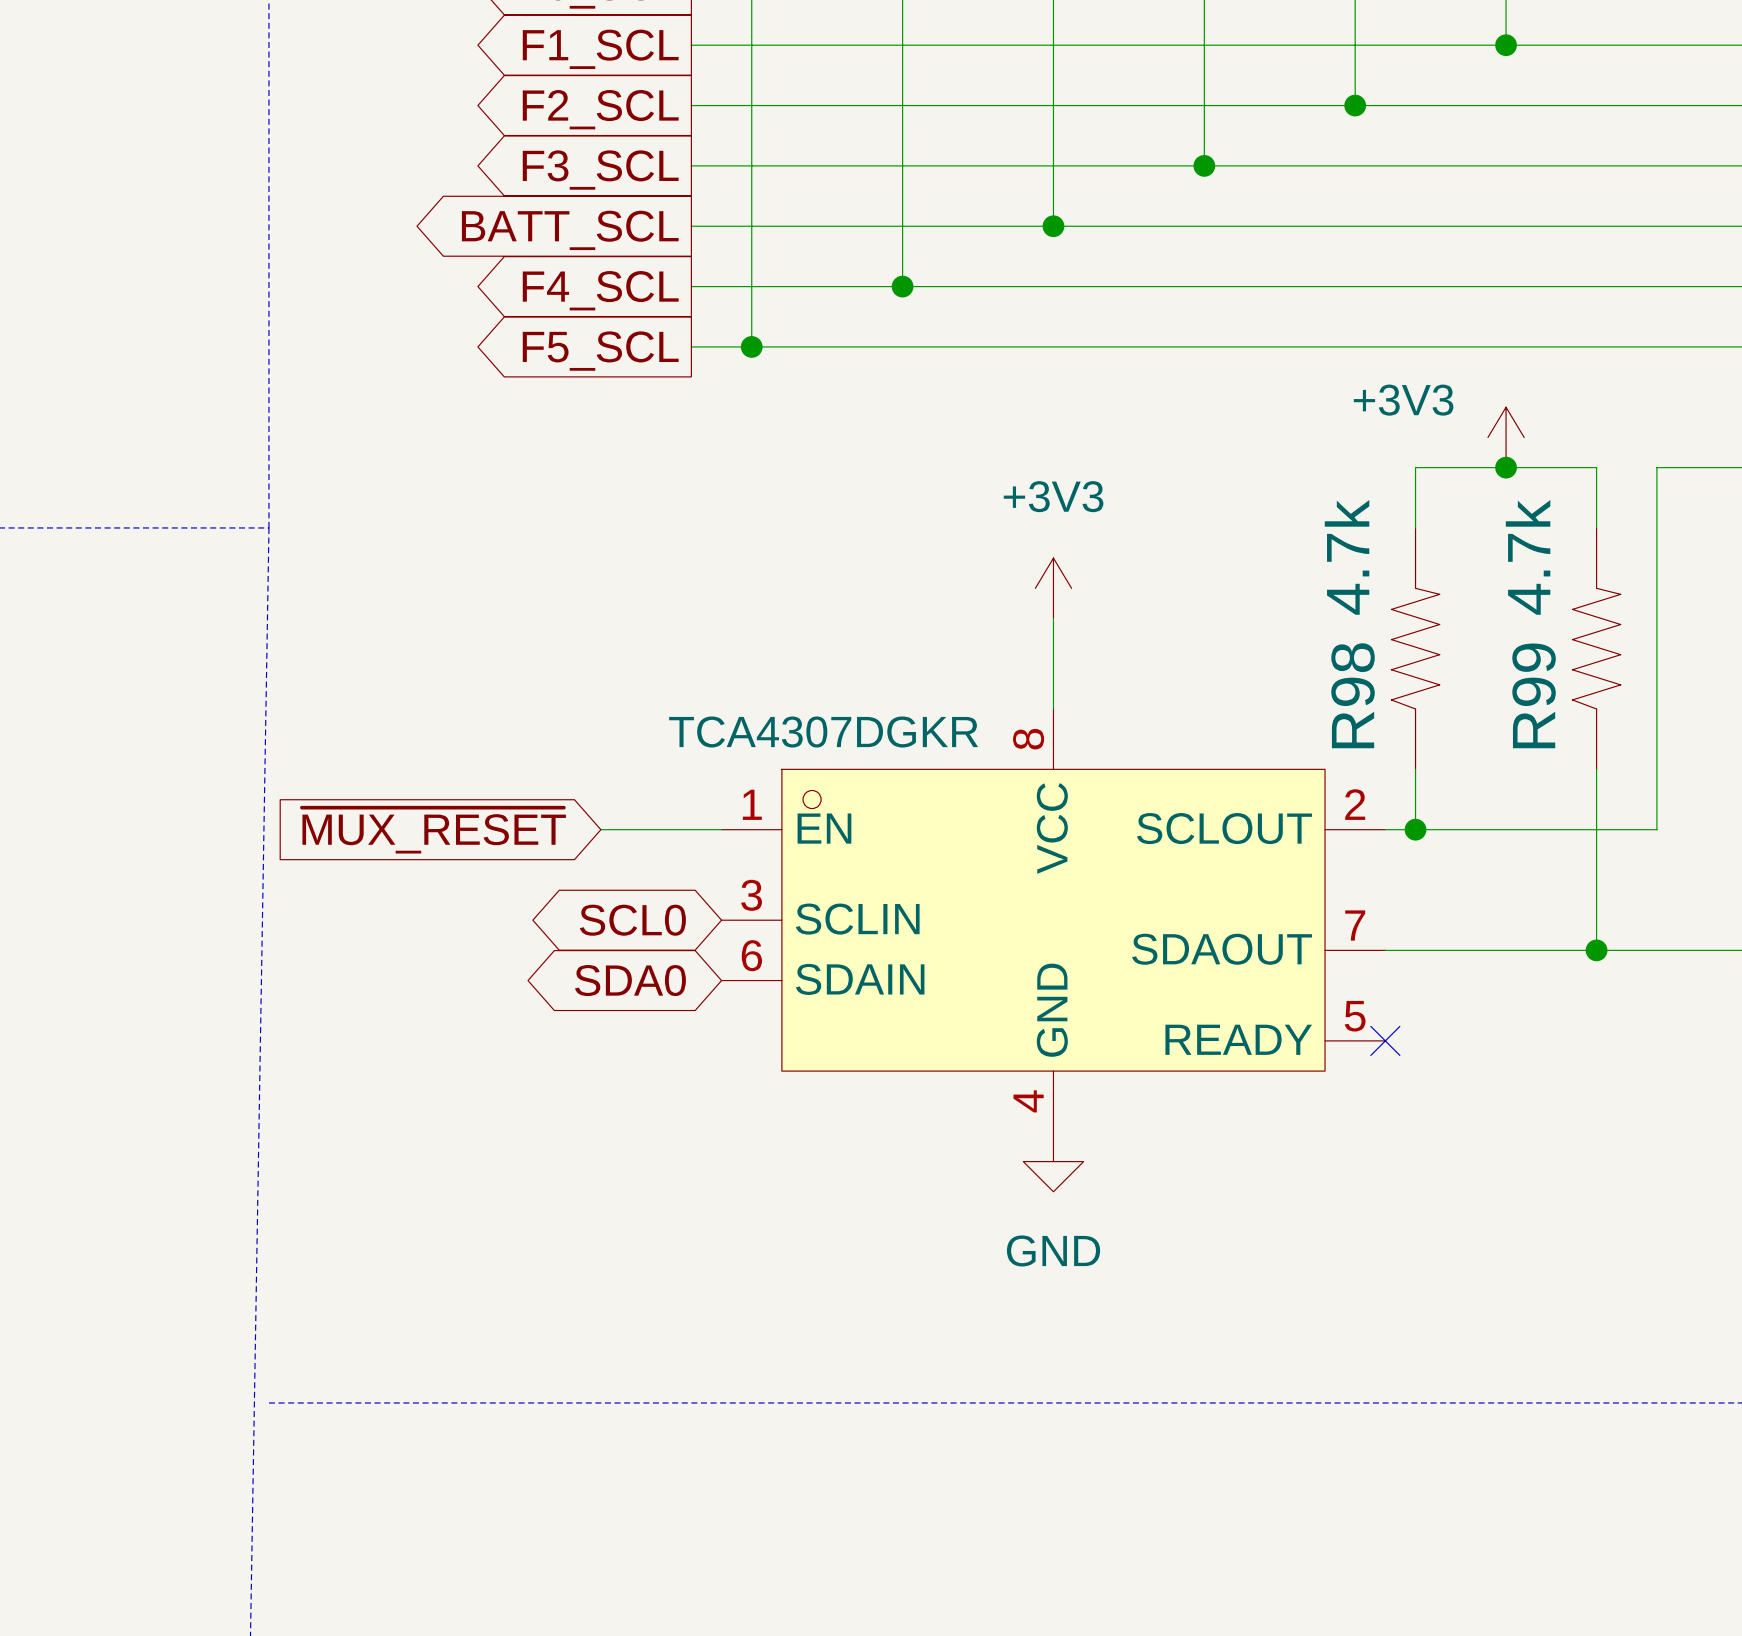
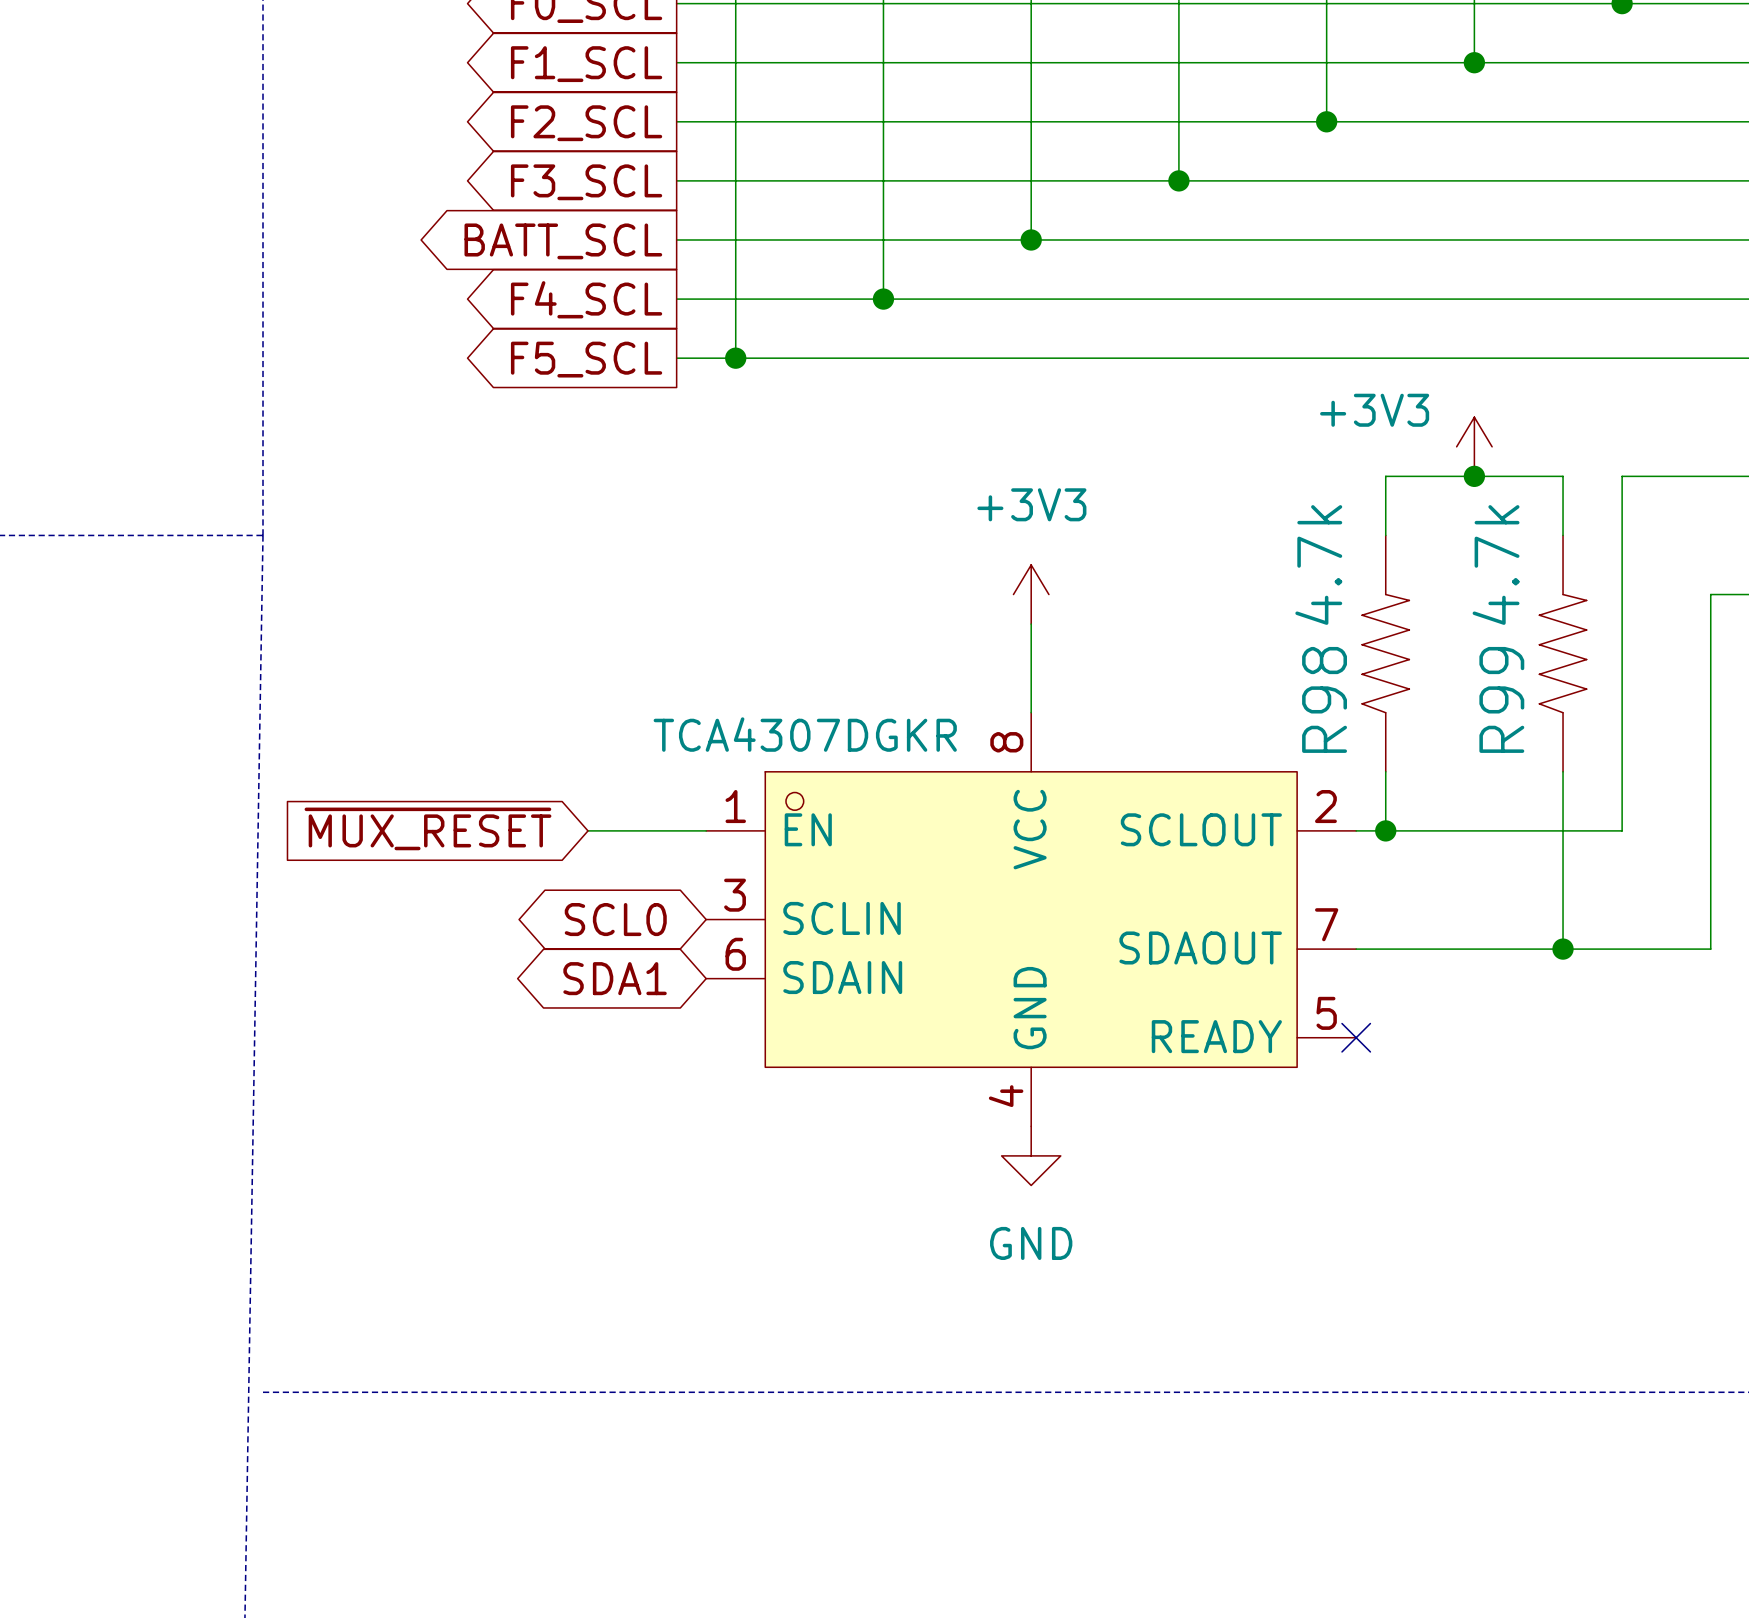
global label: SDA0 (630, 980) -> SDA1 (615, 978)

